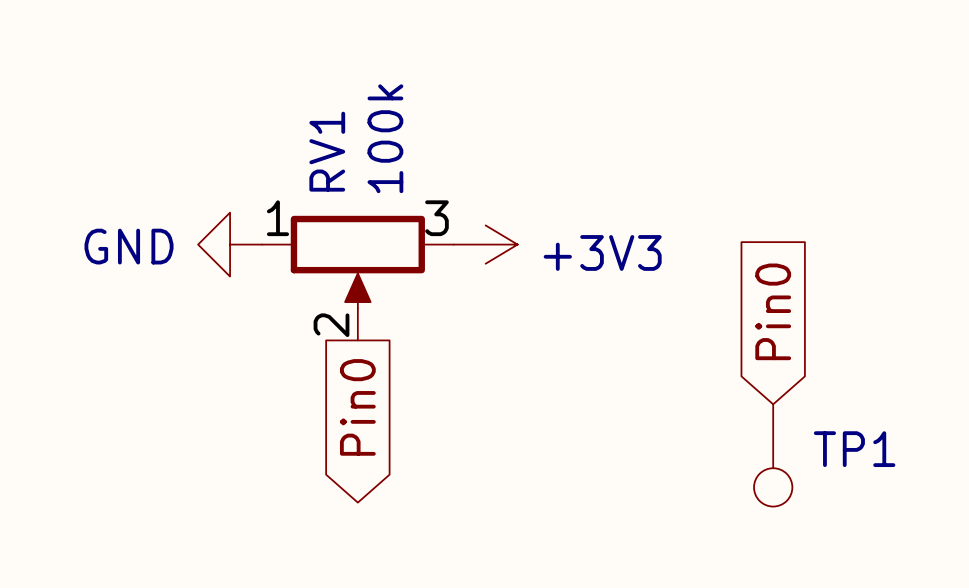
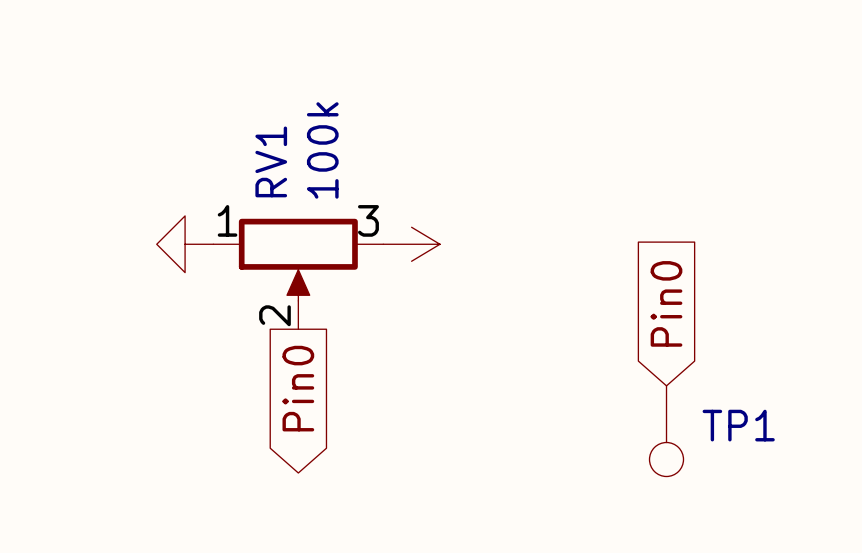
power symbol text: GND (129, 246) -> none
power symbol text: +3V3 (602, 252) -> none

